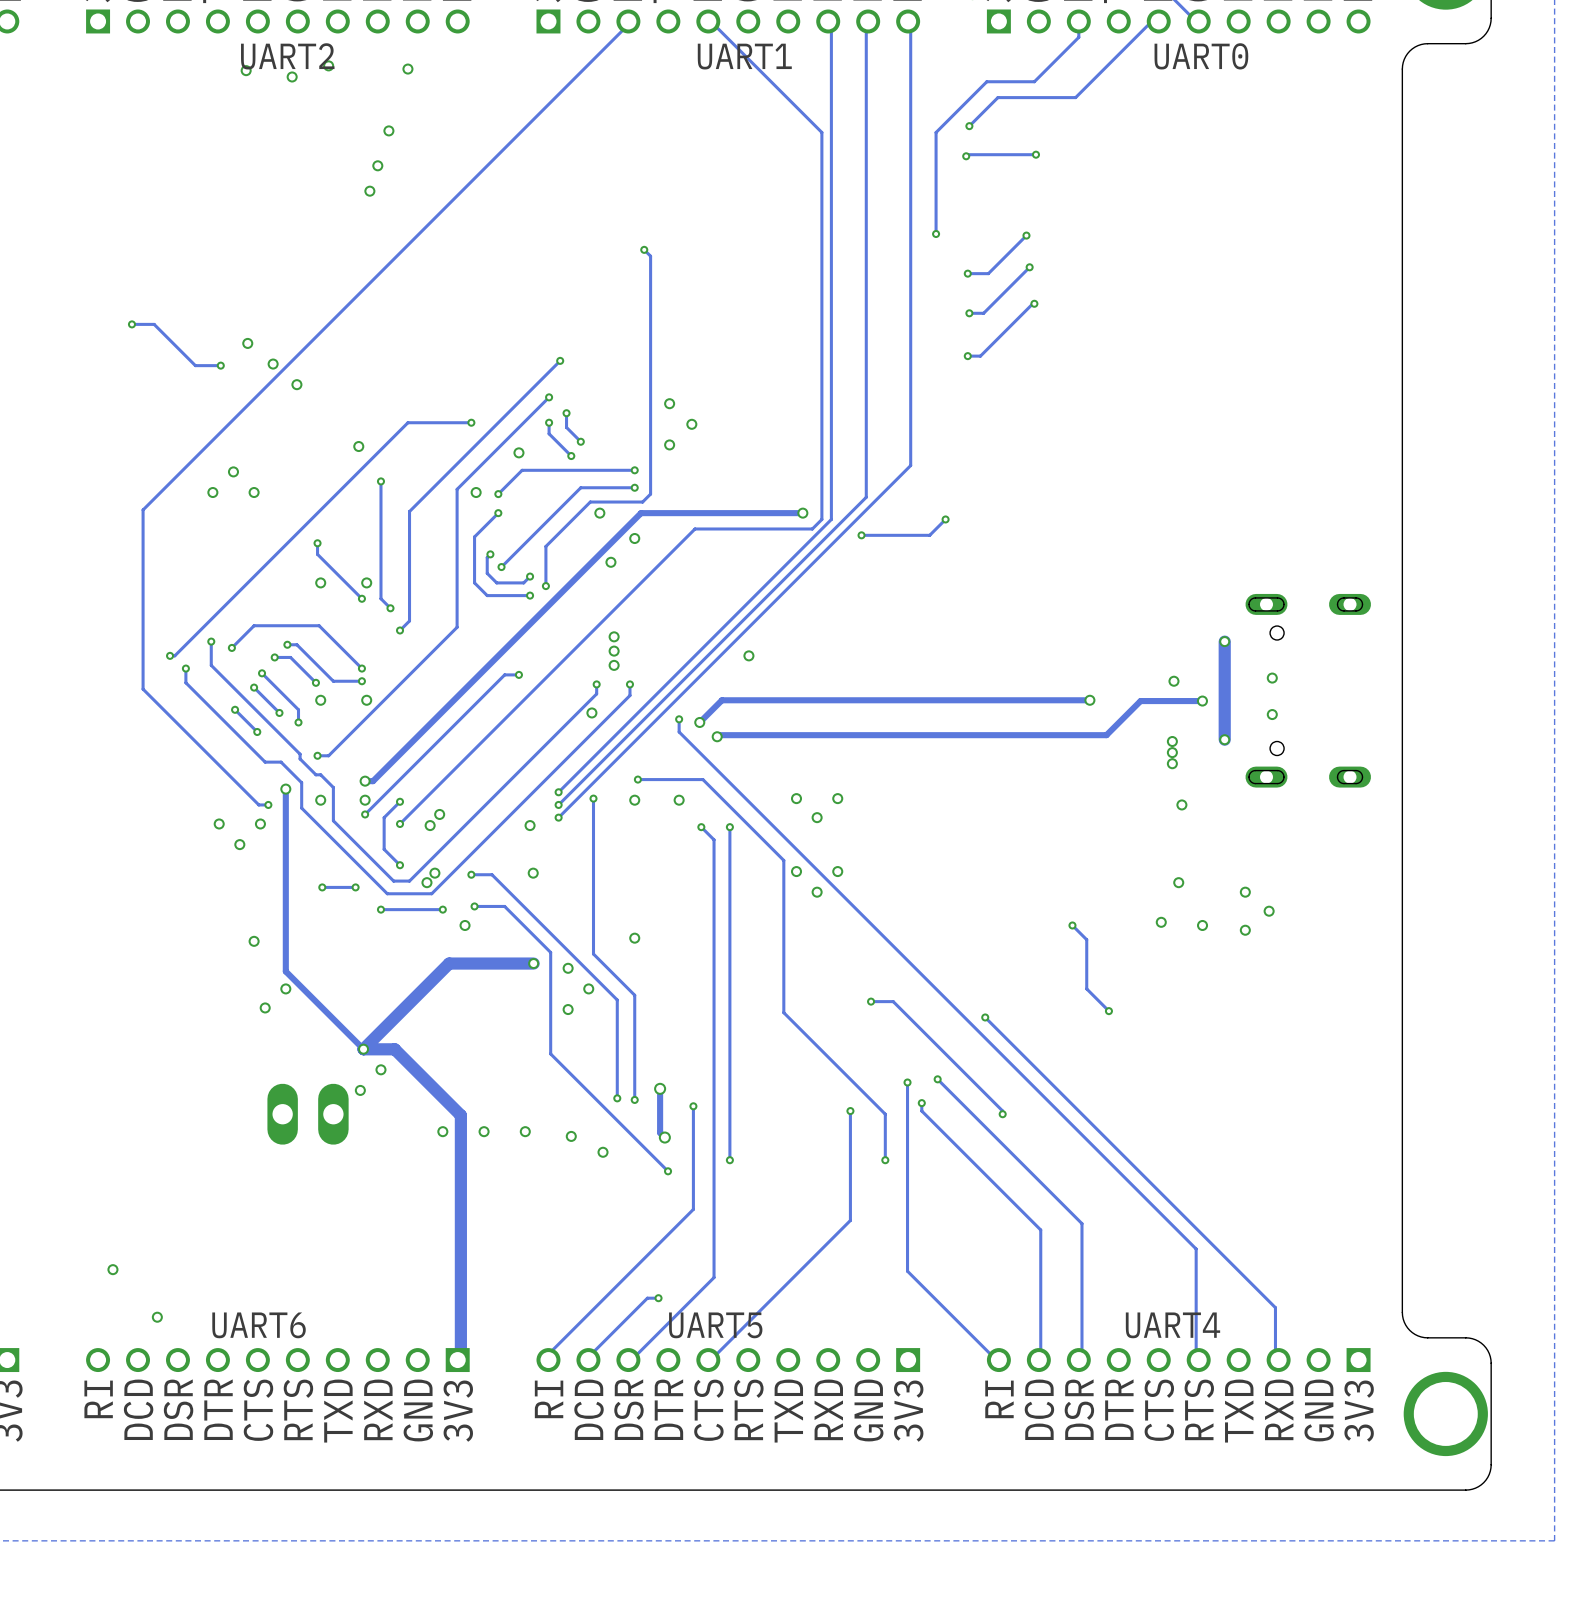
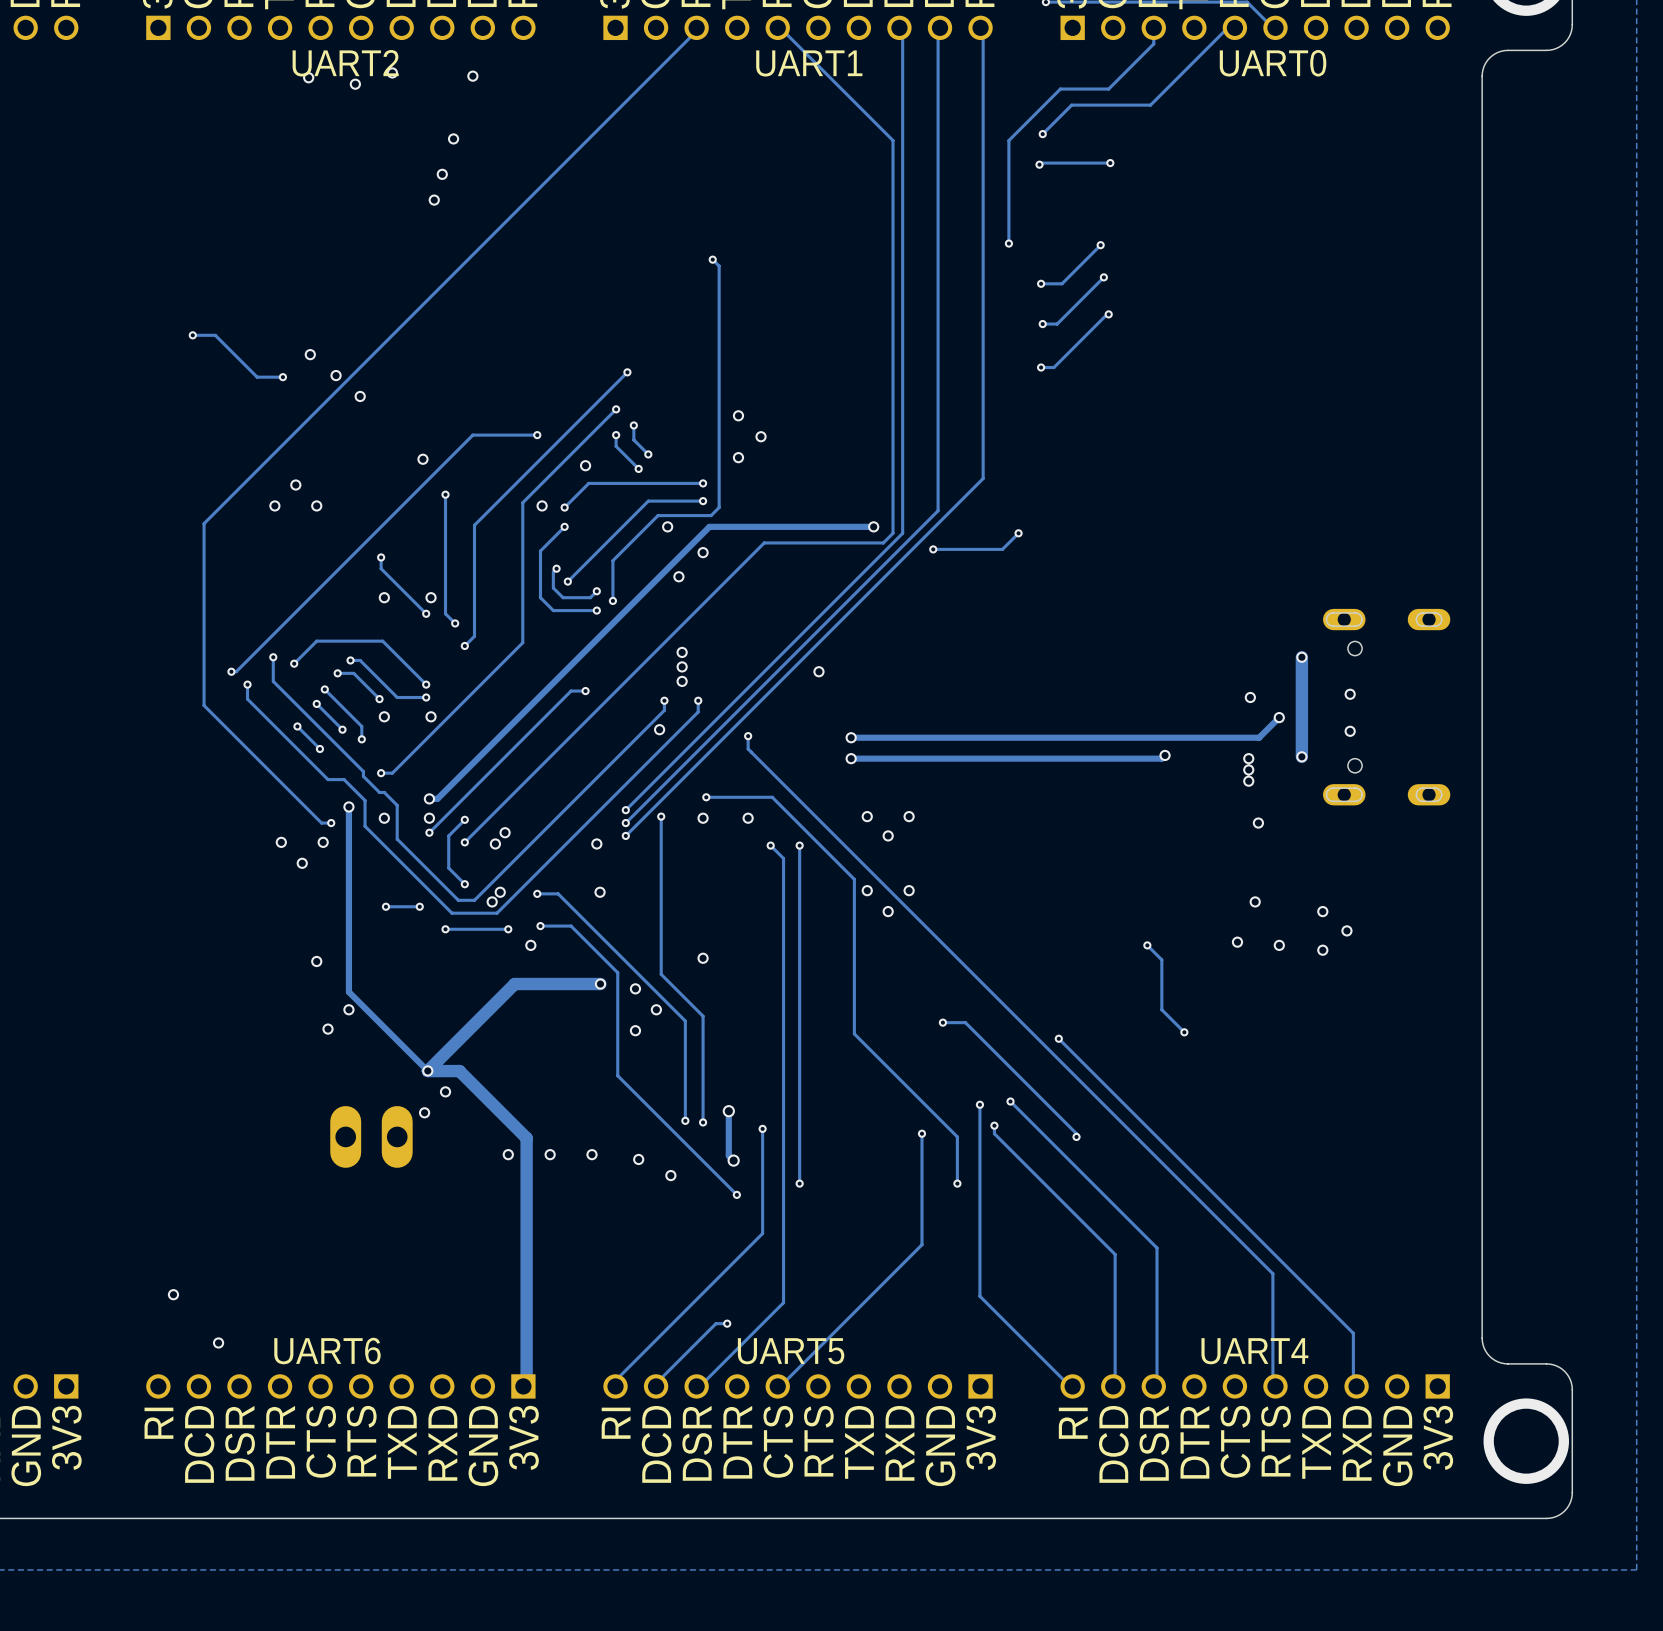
track: (1089, 700) (721, 700) (699, 722) -> none
via position: (1089, 700) -> (1165, 755)
track: (1202, 701) (1140, 701) (1106, 735) (718, 735) (717, 736) -> (1279, 717) (1259, 737) (851, 737)
via: none -> (851, 737)
via: (699, 722) -> none
via: (717, 736) -> none
track: none -> (1165, 755) (1161, 758) (851, 758)
via: none -> (851, 758)

